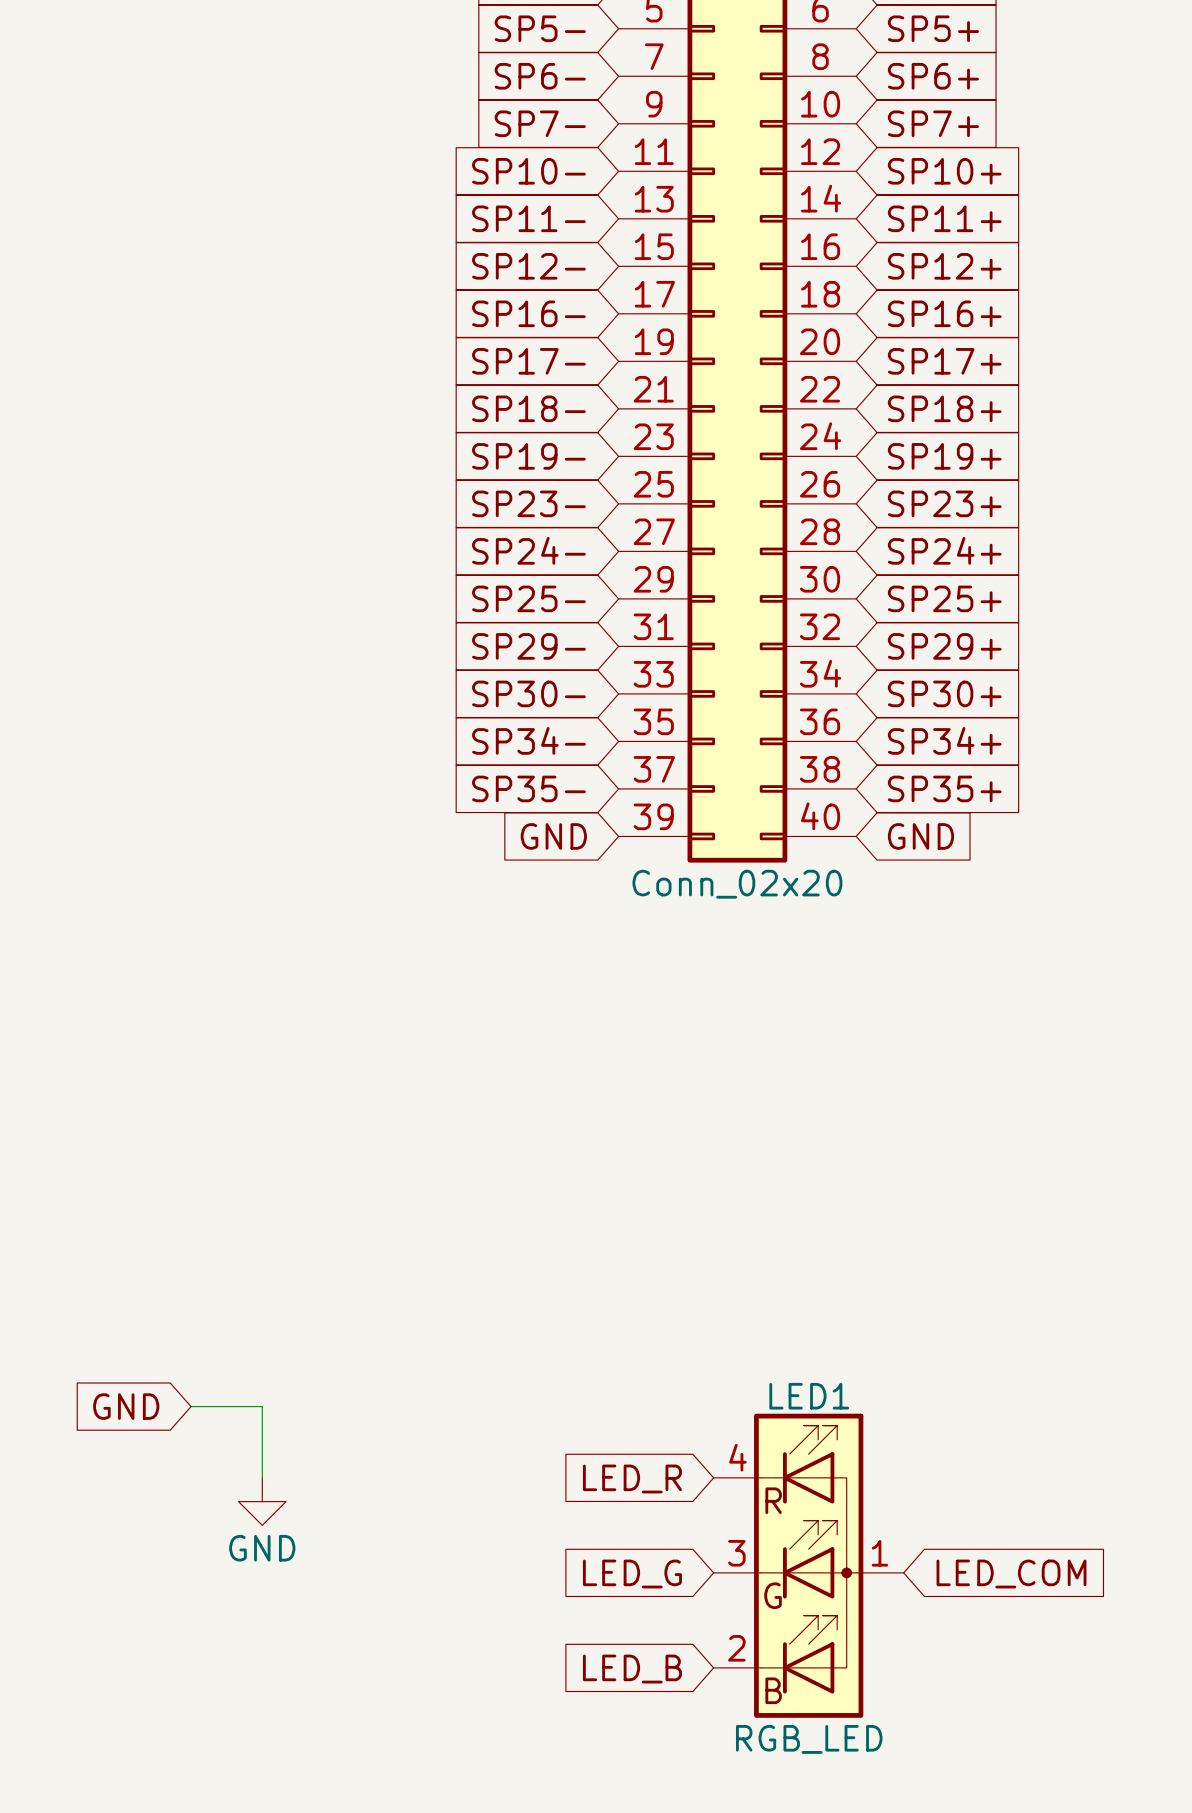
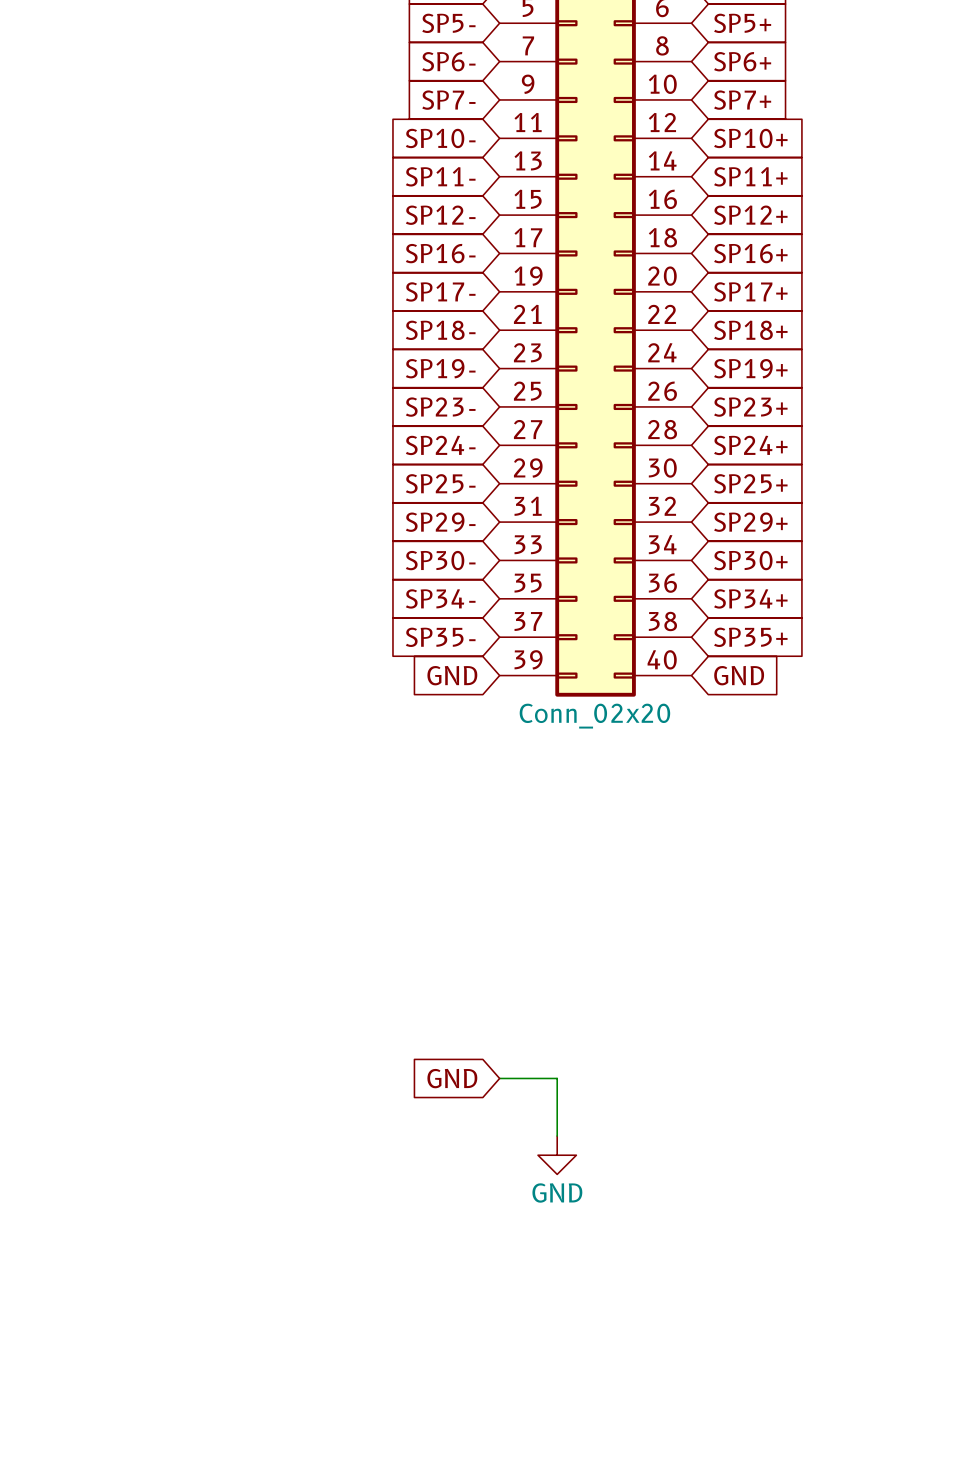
global label position: GND (126, 1406) -> GND (452, 1078)
wire: (191, 1406) (262, 1406) (262, 1477) -> (499, 1078) (557, 1078) (557, 1136)
global label: LED_R (632, 1479) -> none
power symbol position: GND (262, 1501) -> GND (557, 1155)
LED1: RGB_LED (808, 1565) -> none
global label: LED_G (632, 1574) -> none
global label: LED_COM (1011, 1574) -> none
global label: LED_B (632, 1669) -> none

